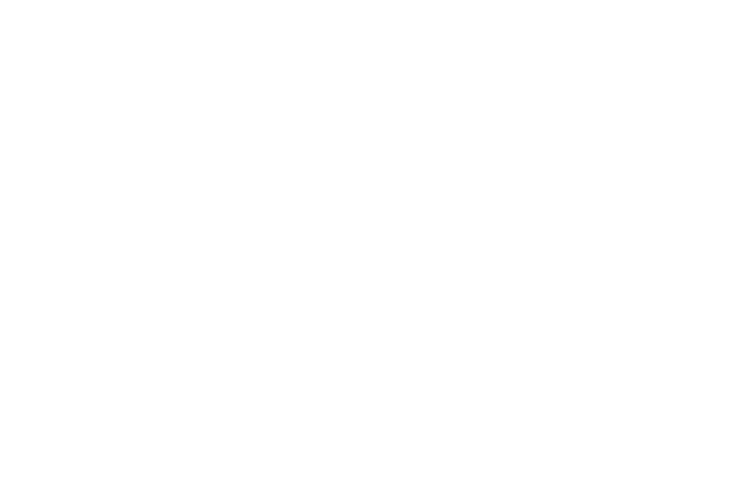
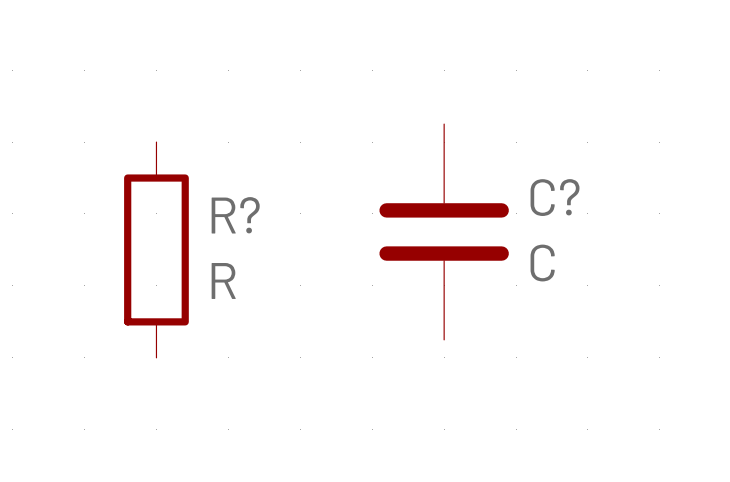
C?: none -> C (444, 231)
R?: none -> R (156, 249)

